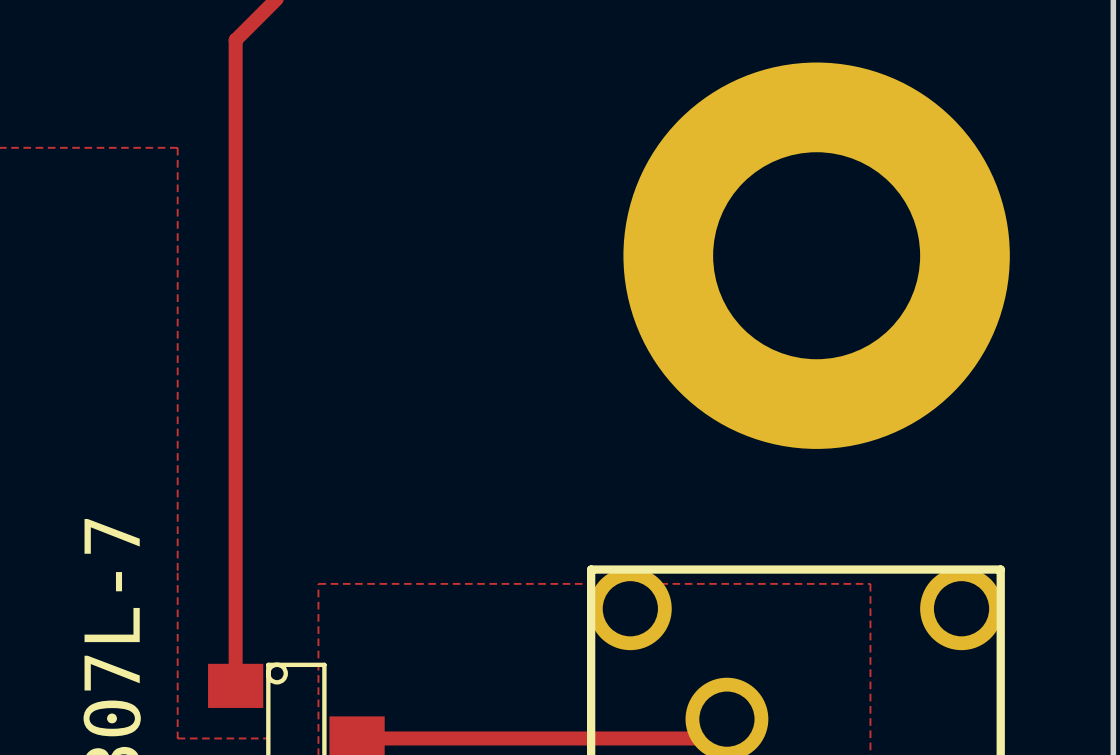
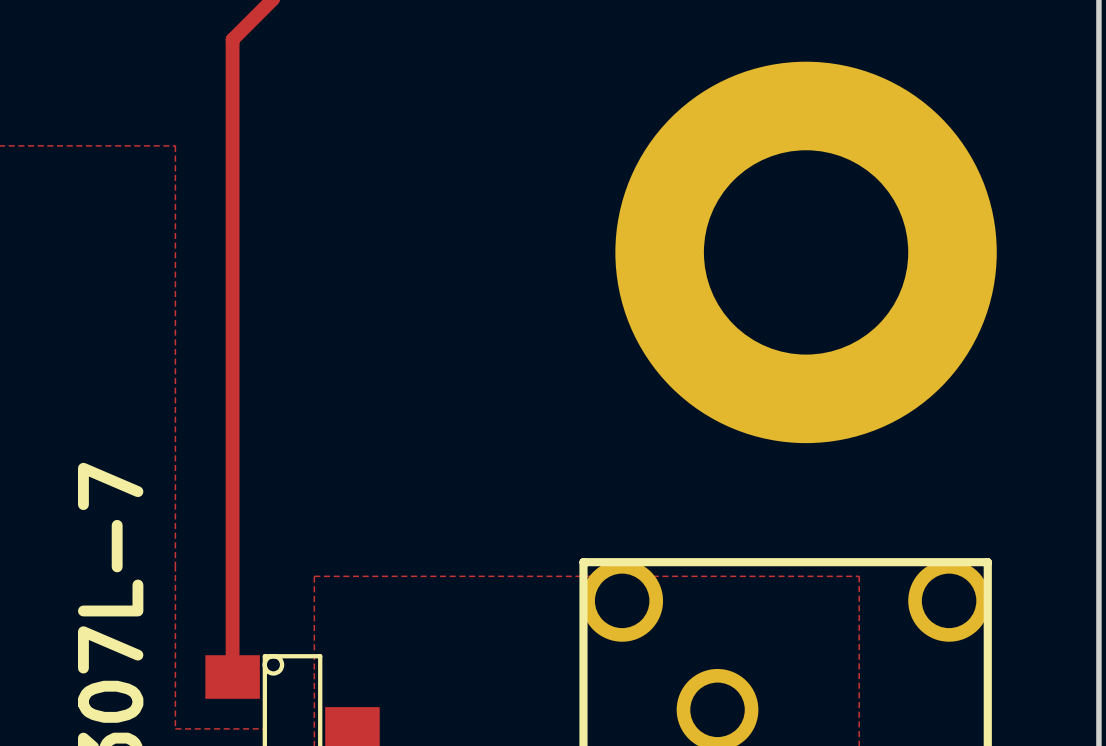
track: (726, 719) (707, 738) (357, 738) -> none

